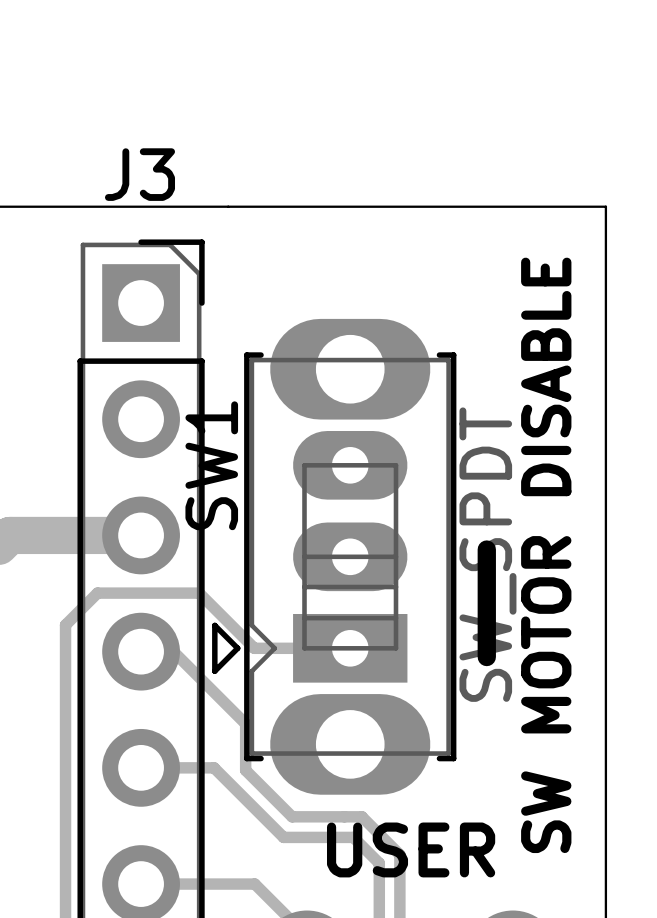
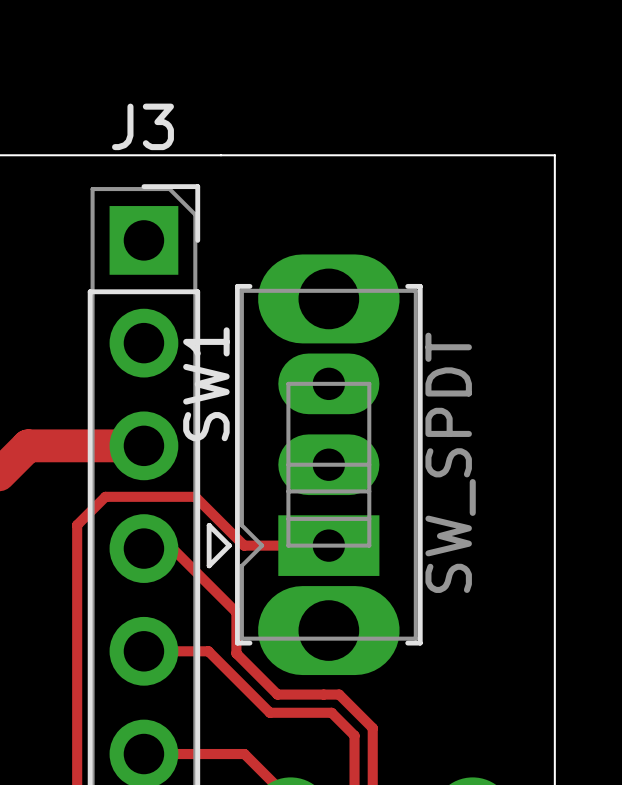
line: (486, 549) (486, 657) -> none
text: SW MOTOR DISABLE (546, 555) -> none
text: USER (411, 849) -> none

